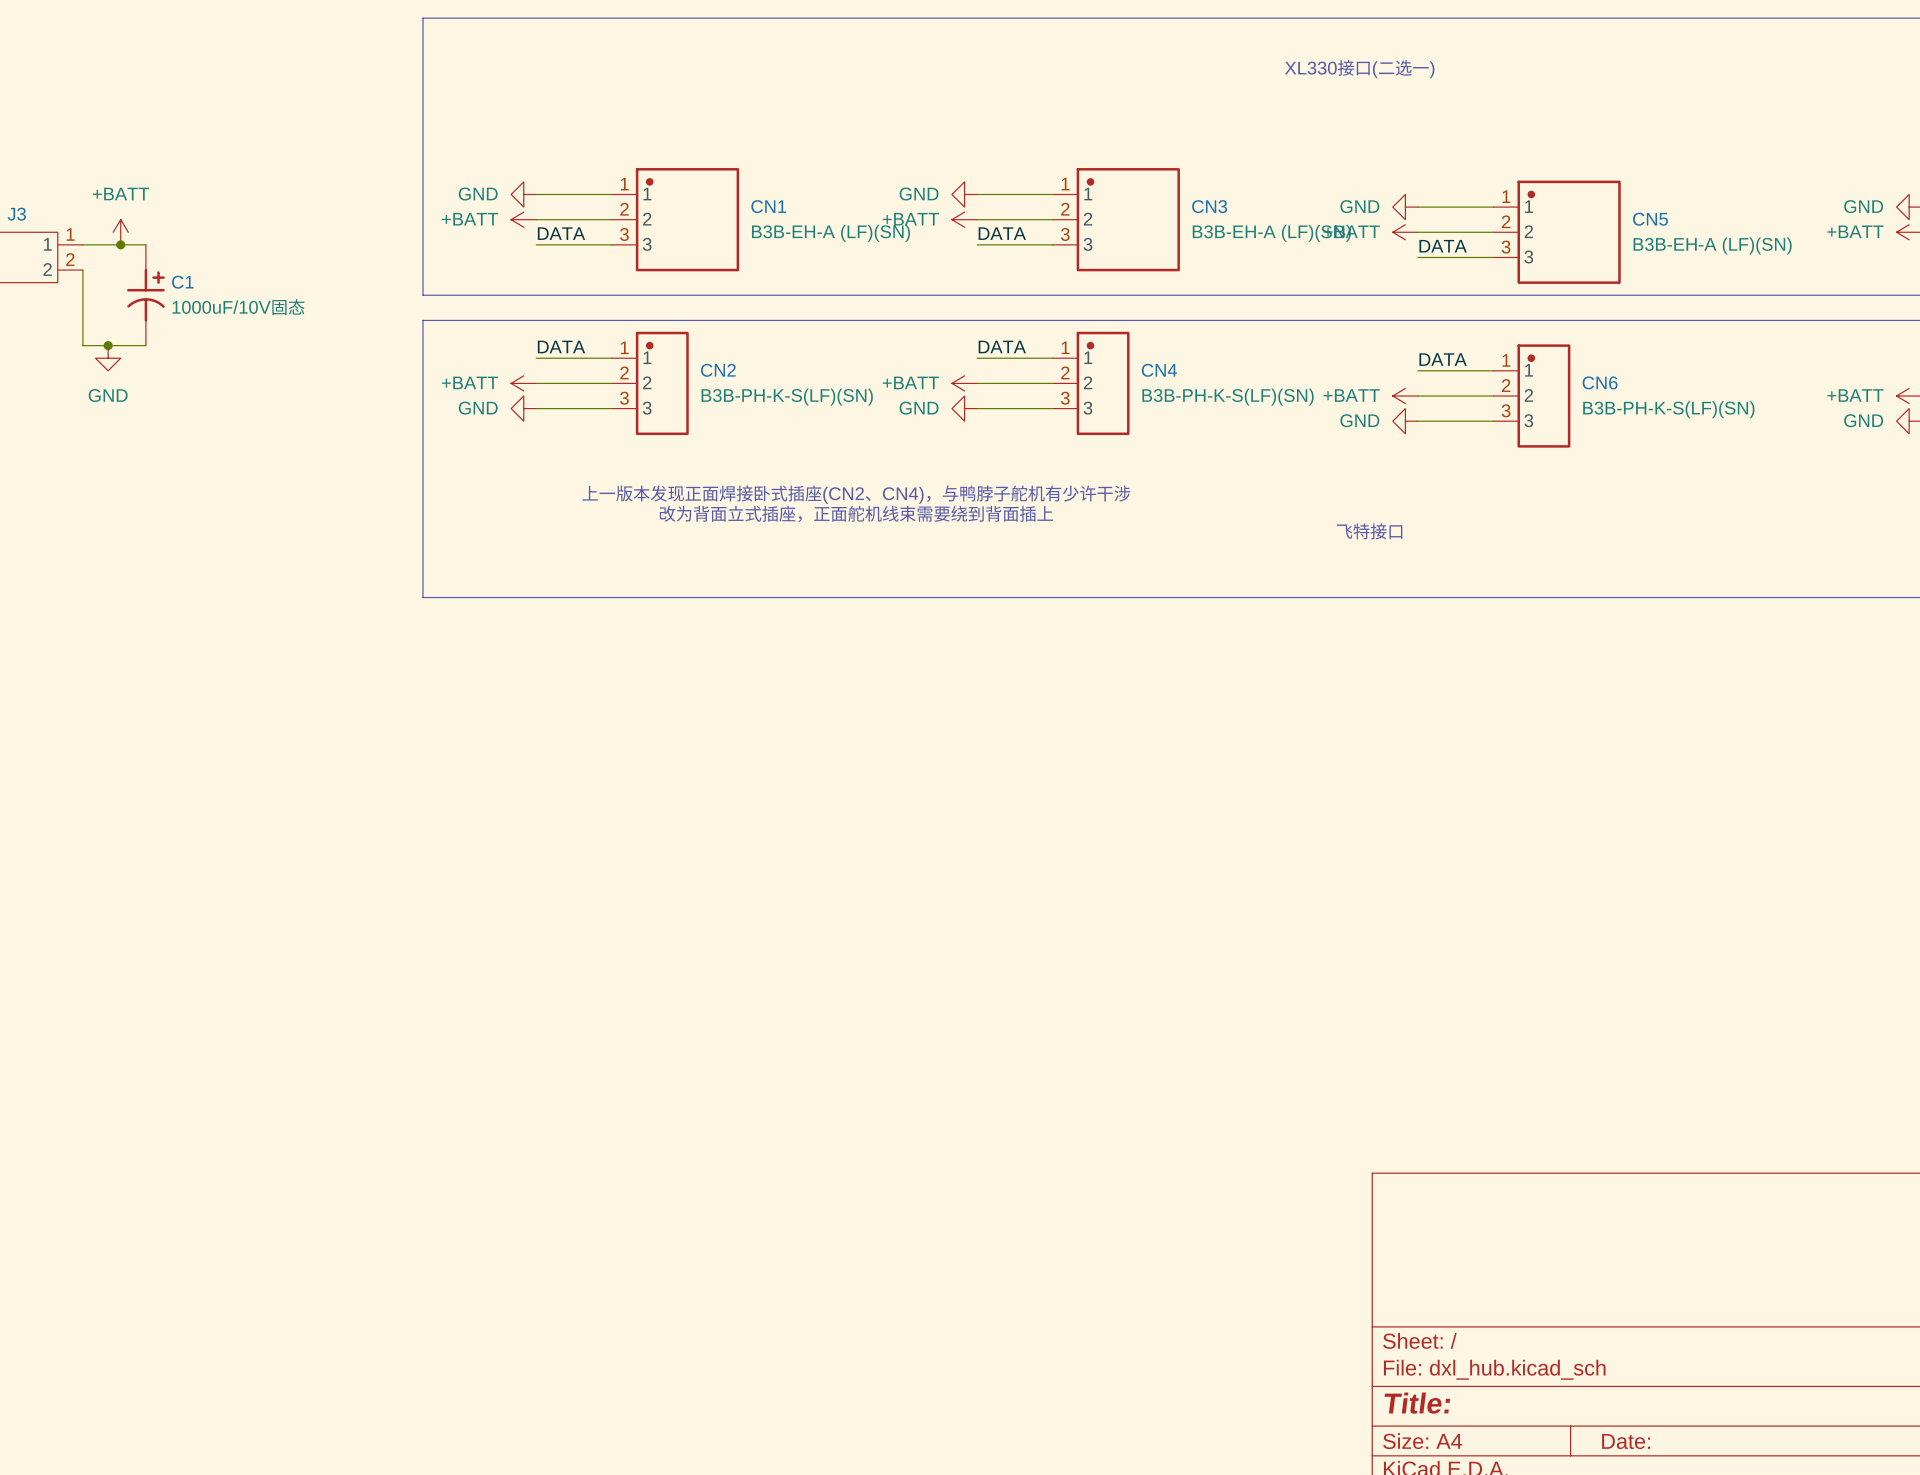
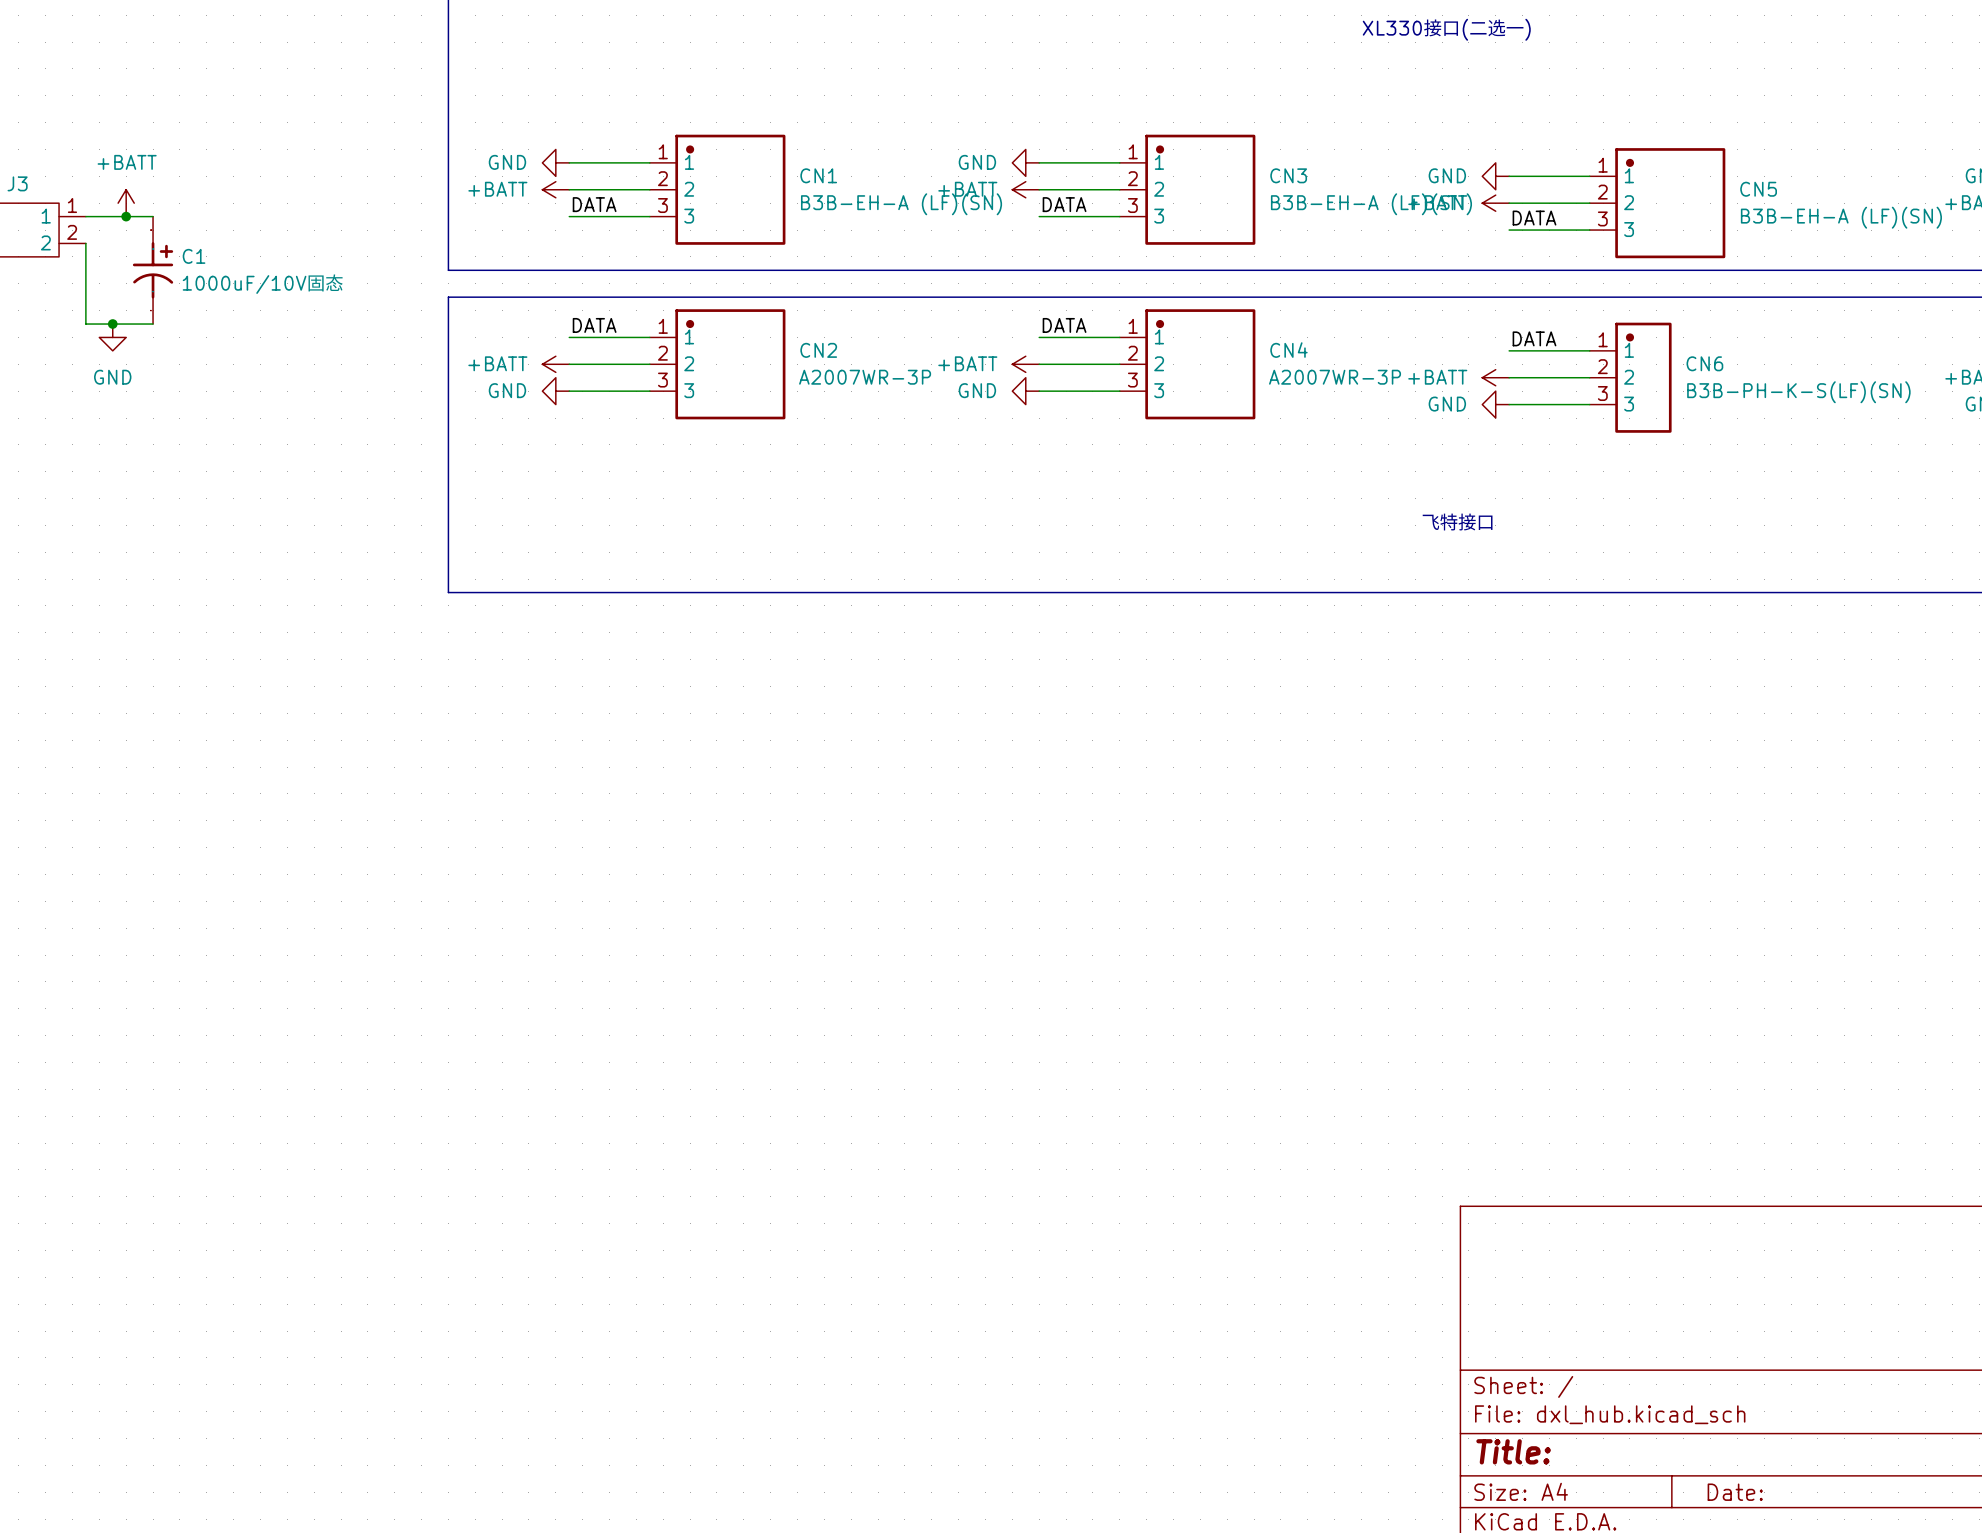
CN2 symbol: [611, 331, 689, 436] -> [649, 309, 786, 420]
CN4 symbol: [1052, 331, 1130, 436] -> [1119, 309, 1256, 420]
CN2 name position: CN2 (718, 370) -> CN2 (818, 350)
CN4 name position: CN4 (1159, 370) -> CN4 (1288, 350)
CN2 value: B3B-PH-K-S(LF)(SN) (787, 397) -> A2007WR-3P (865, 377)
CN4 value: B3B-PH-K-S(LF)(SN) (1228, 397) -> A2007WR-3P (1335, 377)
text: 上一版本发现正面焊接卧式插座(CN2、CN4)，与鸭脖子舵机有少许干涉 (856, 494) -> none
text: 改为背面立式插座，正面舵机线束需要绕到背面插上 (856, 514) -> none

